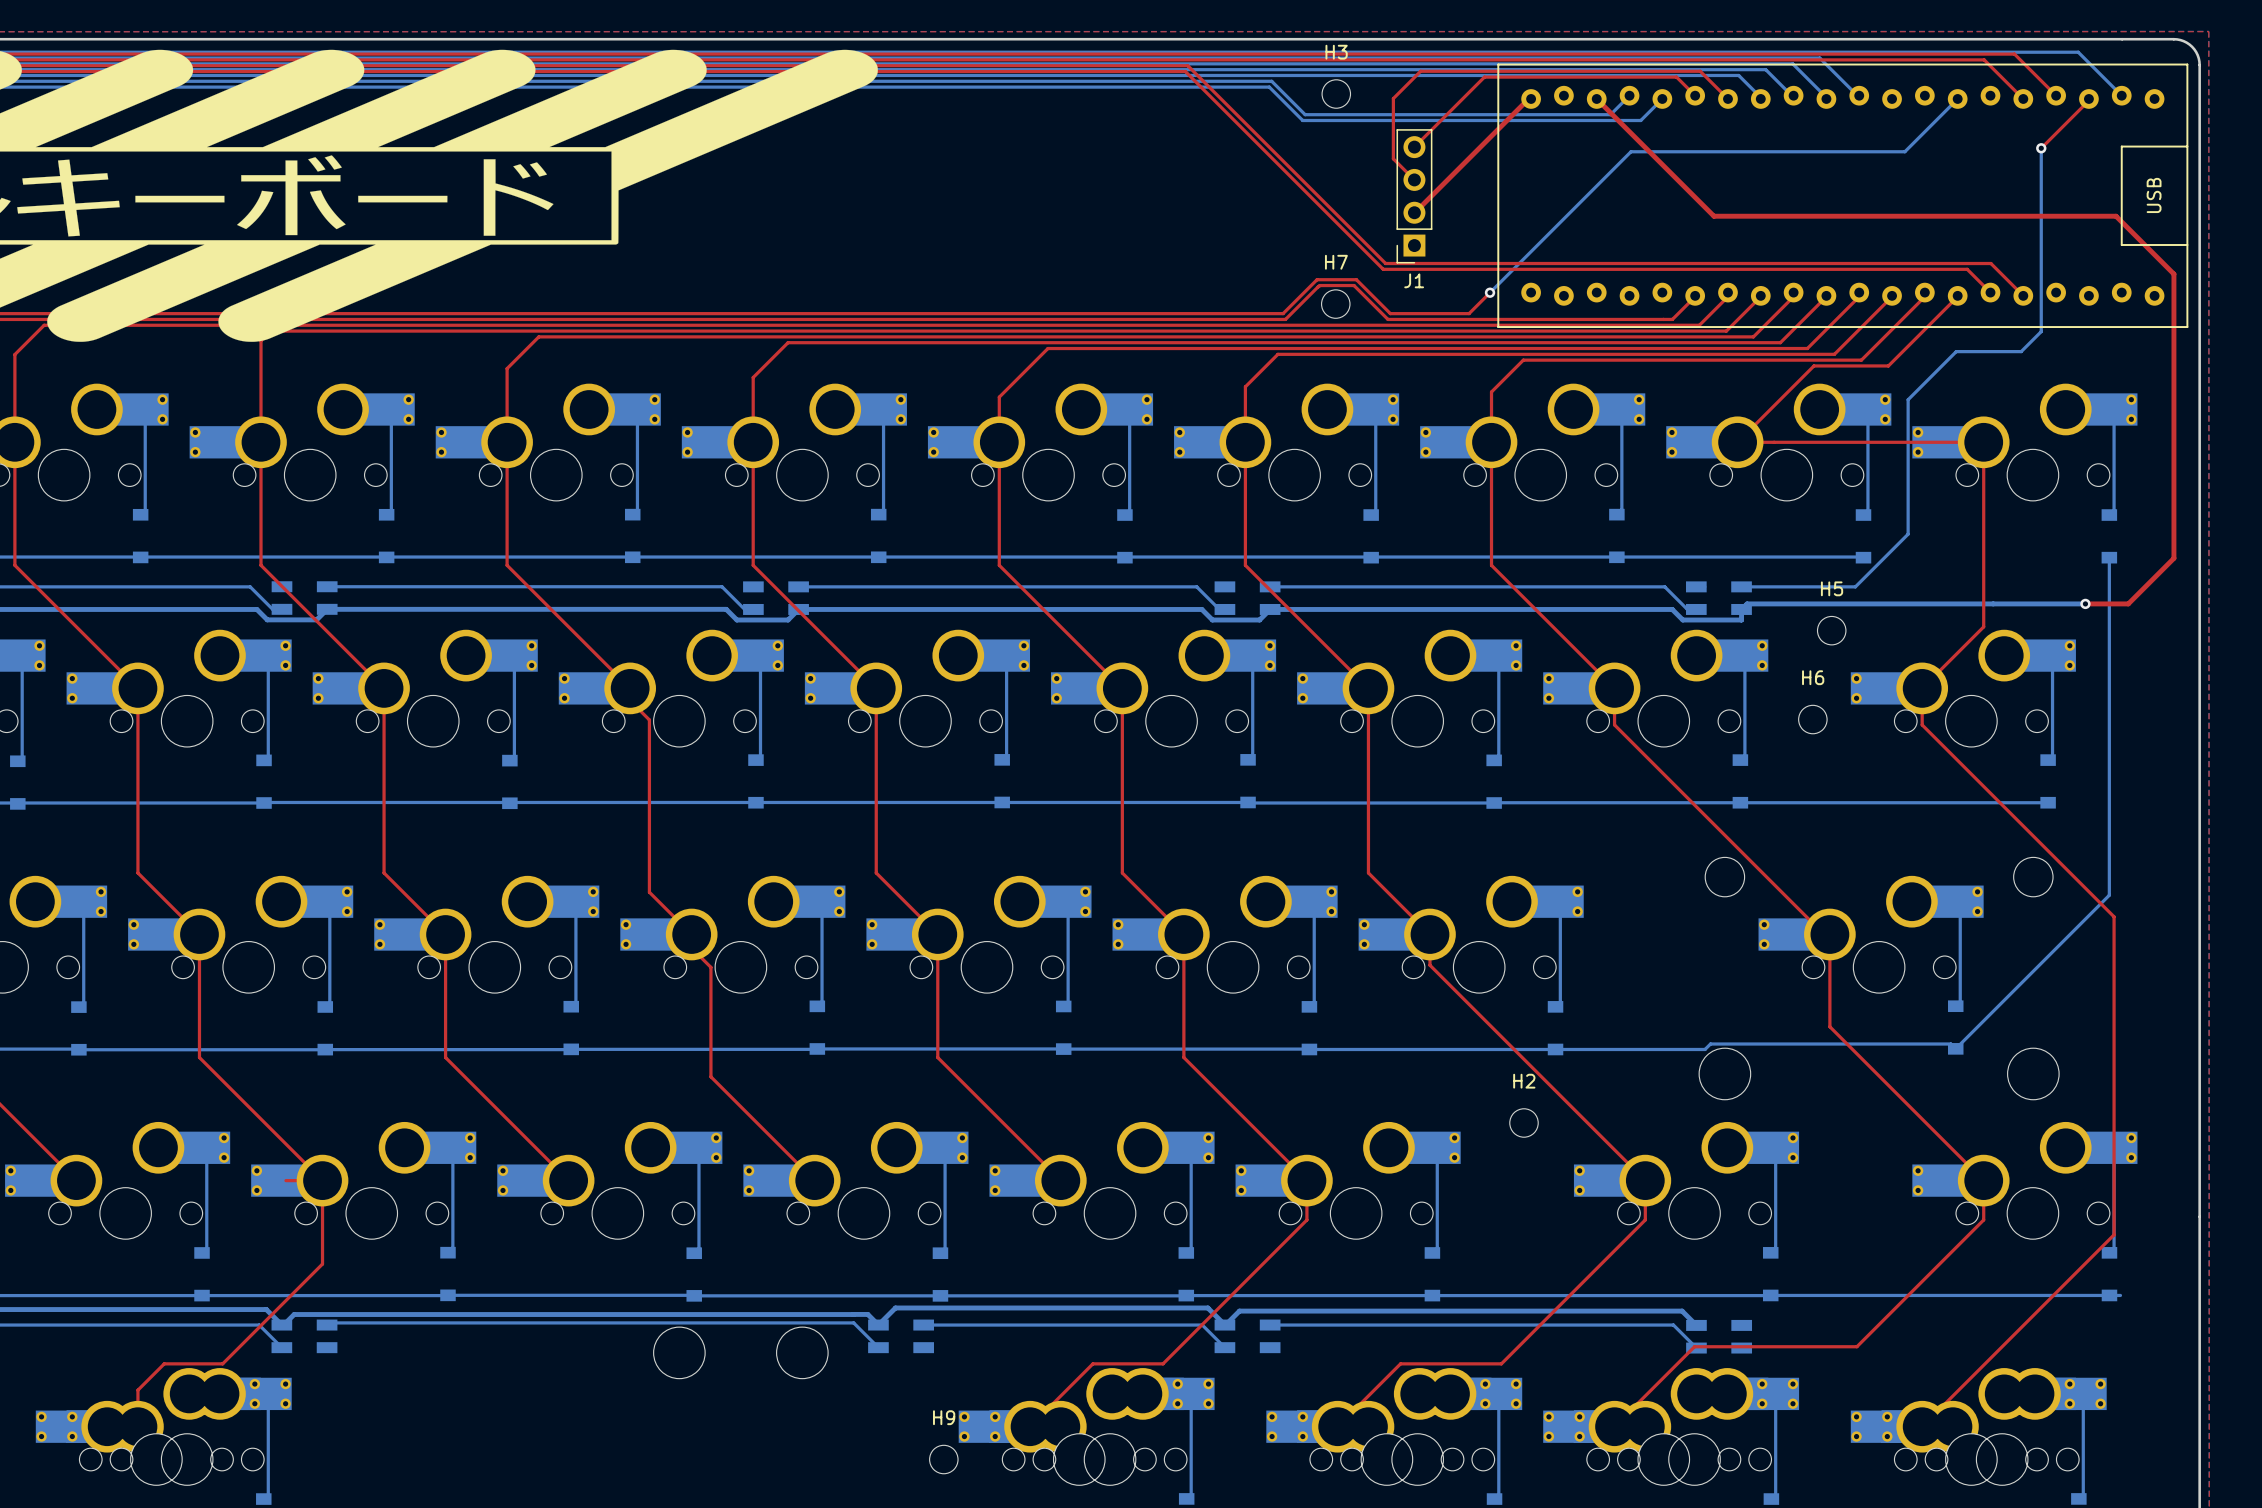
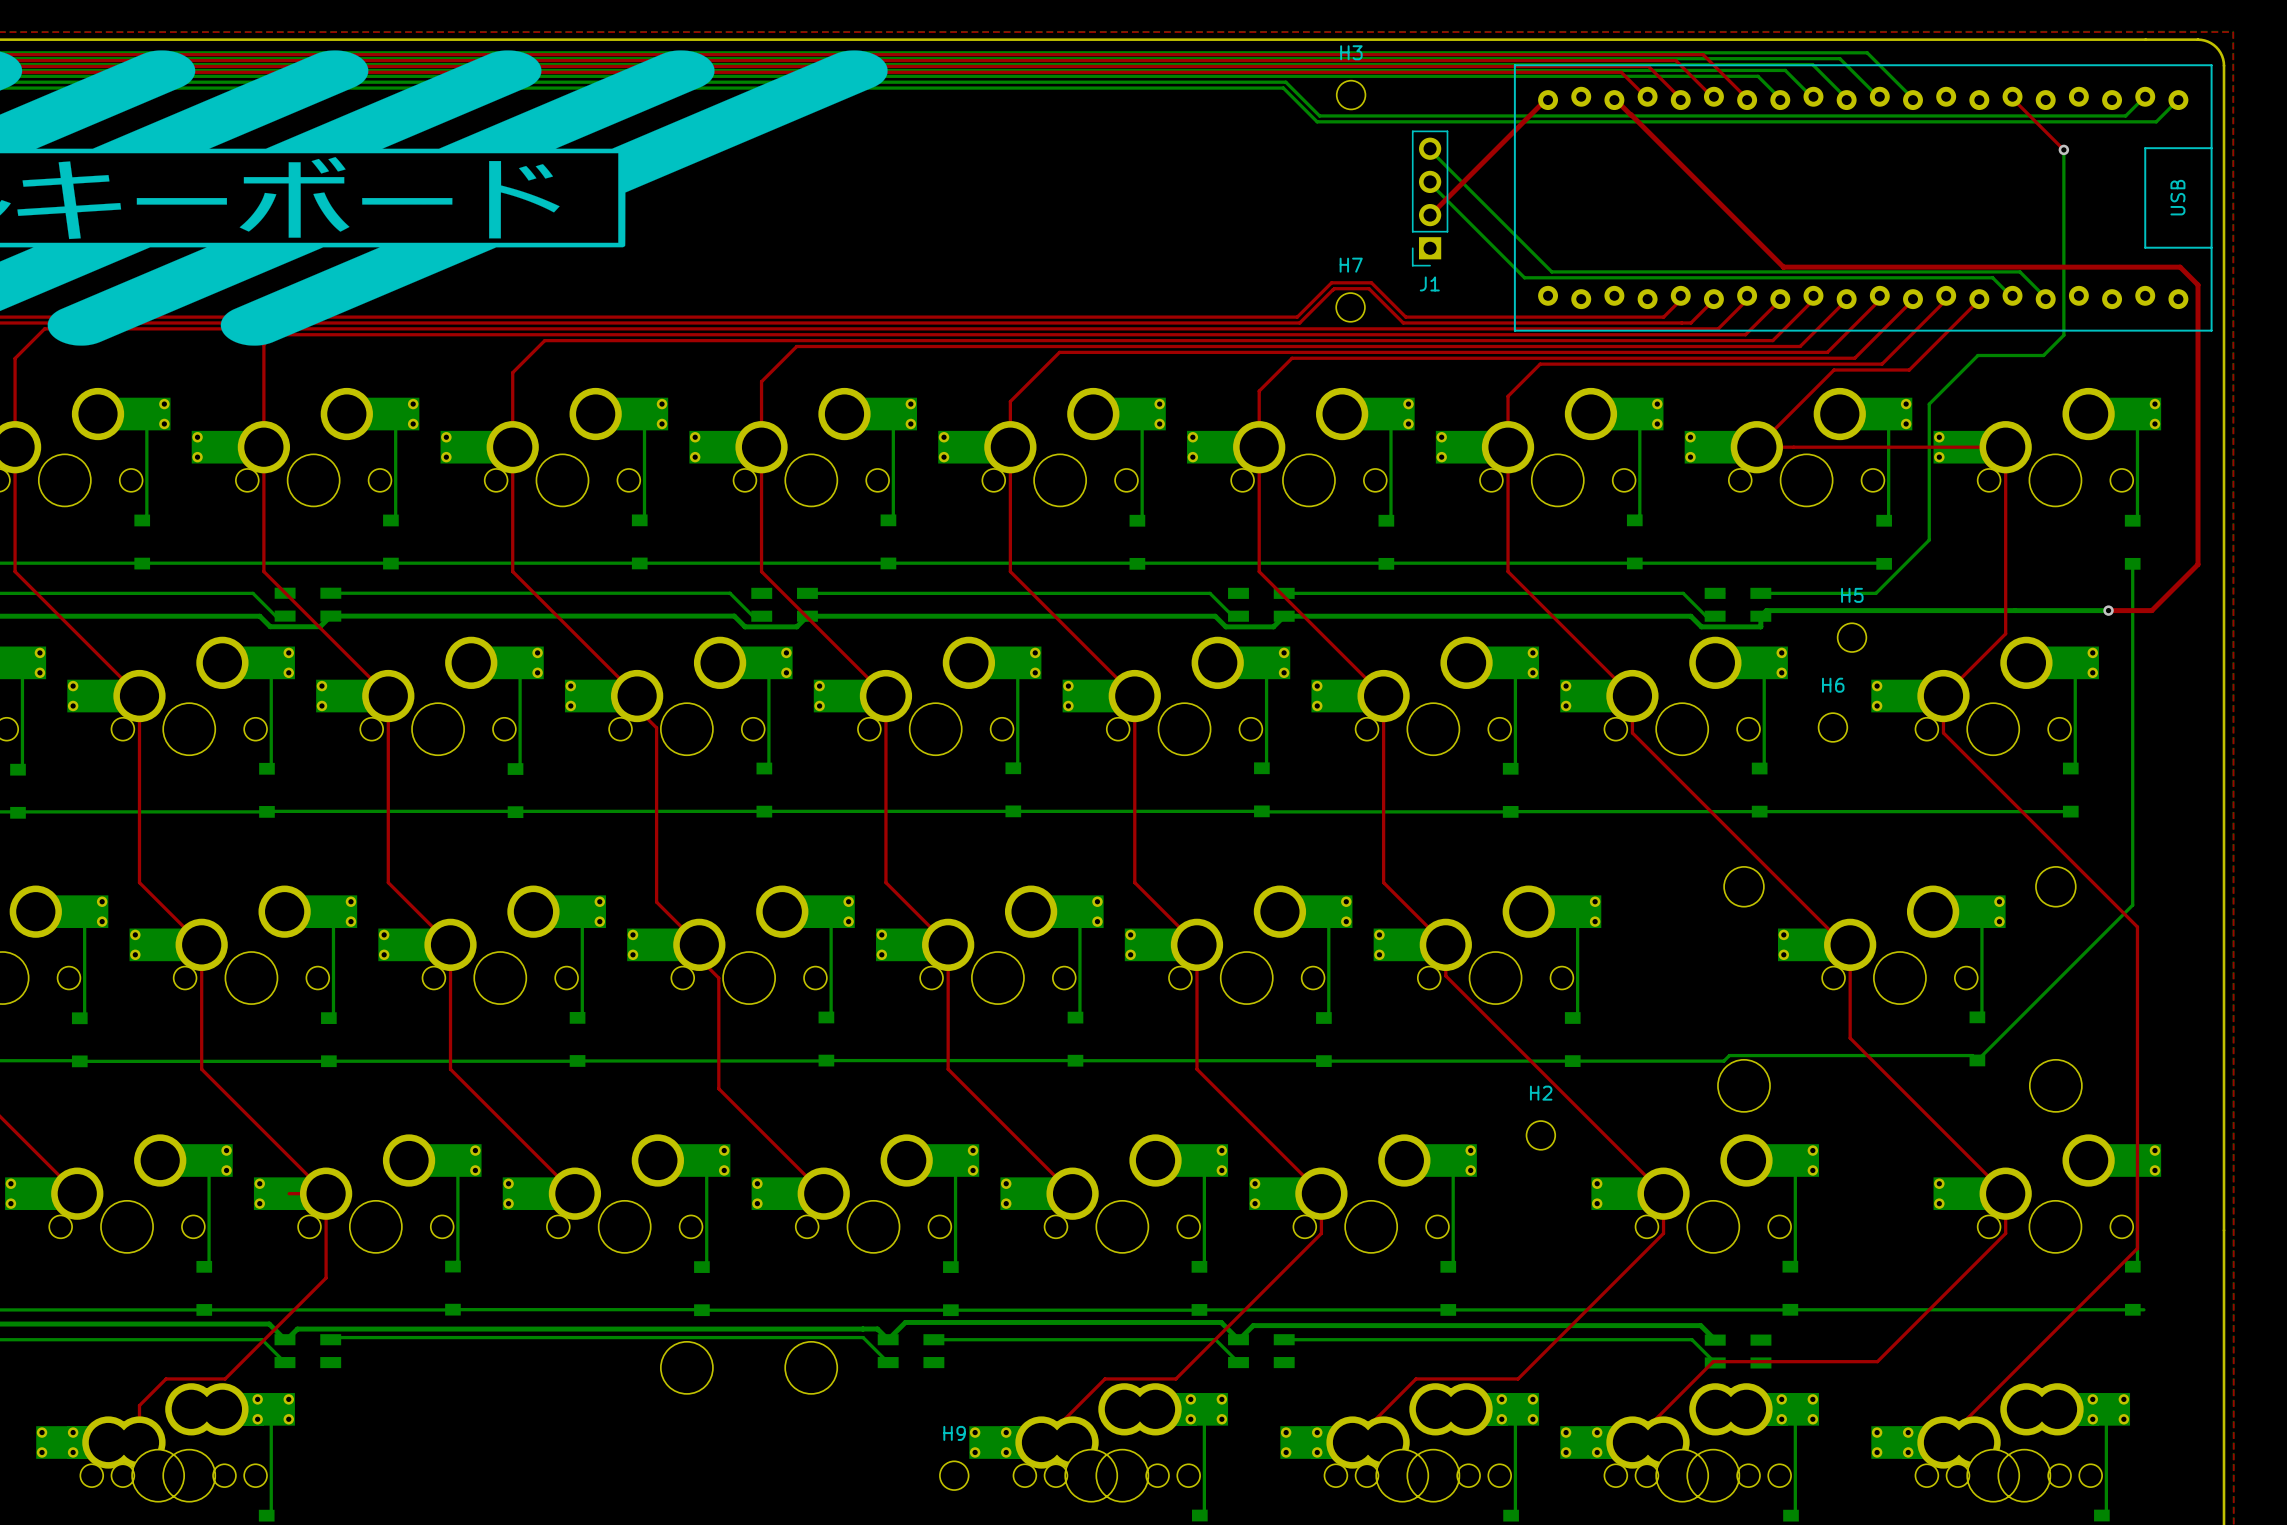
bottom track: (1846, 52) (2078, 52) (2121, 95) -> (1867, 52) (1914, 99)
top track: (1684, 54) (2014, 54) (2056, 95) -> (1703, 54) (1748, 99)
top track: (1657, 59) (1984, 59) (2023, 98) -> (1675, 60) (1715, 99)
top track: (1187, 65) (1385, 263) (1990, 263) (2023, 295) -> (1201, 66) (1648, 66) (1681, 99)
top track: (1185, 71) (1383, 269) (1967, 269) (1990, 292) -> (1198, 72) (1621, 72) (1648, 99)
bottom track: (1629, 95) (1610, 114) -> (2145, 96) (2125, 115) (1628, 115)
top track: (1695, 95) (1676, 77) (1484, 77) (1414, 147) -> none
top track: (1596, 98) (1713, 216) (2116, 216) (2173, 274) (2173, 281) -> (1783, 267) (2180, 267) (2198, 284)
top track: none -> (1615, 99) (1783, 267)
bottom track: (1662, 98) (1640, 120) -> (2178, 99) (2156, 121) (1659, 121)
top track: (1727, 98) (1700, 71) (1420, 71) (1393, 98) (1393, 158) (1414, 179) -> none
bottom track: (1957, 98) (1904, 151) (1630, 151) (1490, 292) -> none
top track: (2088, 98) (2041, 148) -> (2013, 99) (2063, 149)
bottom track: none -> (1429, 149) (1551, 271) (2019, 271) (2046, 298)
bottom track: none -> (1429, 182) (1524, 277) (1992, 277) (2013, 298)
top track: (1490, 292) (1469, 313) -> (1681, 298) (1663, 317) (1485, 317)
via: (1490, 292) -> none

